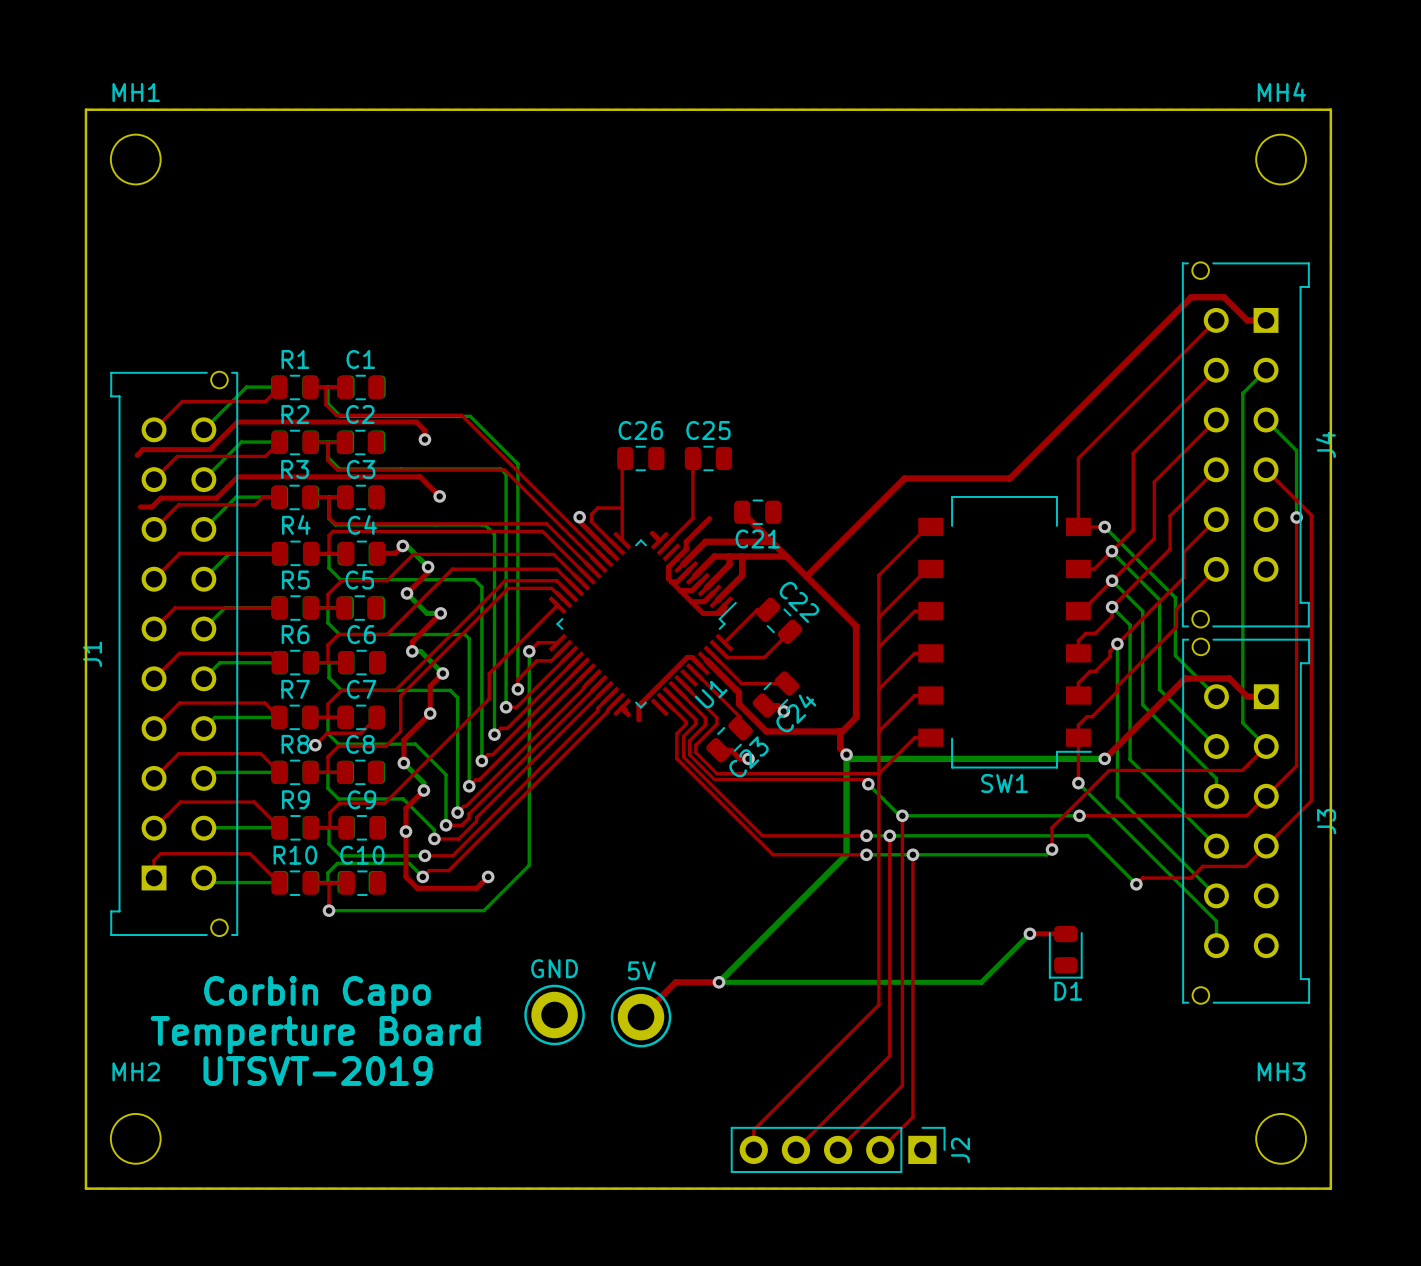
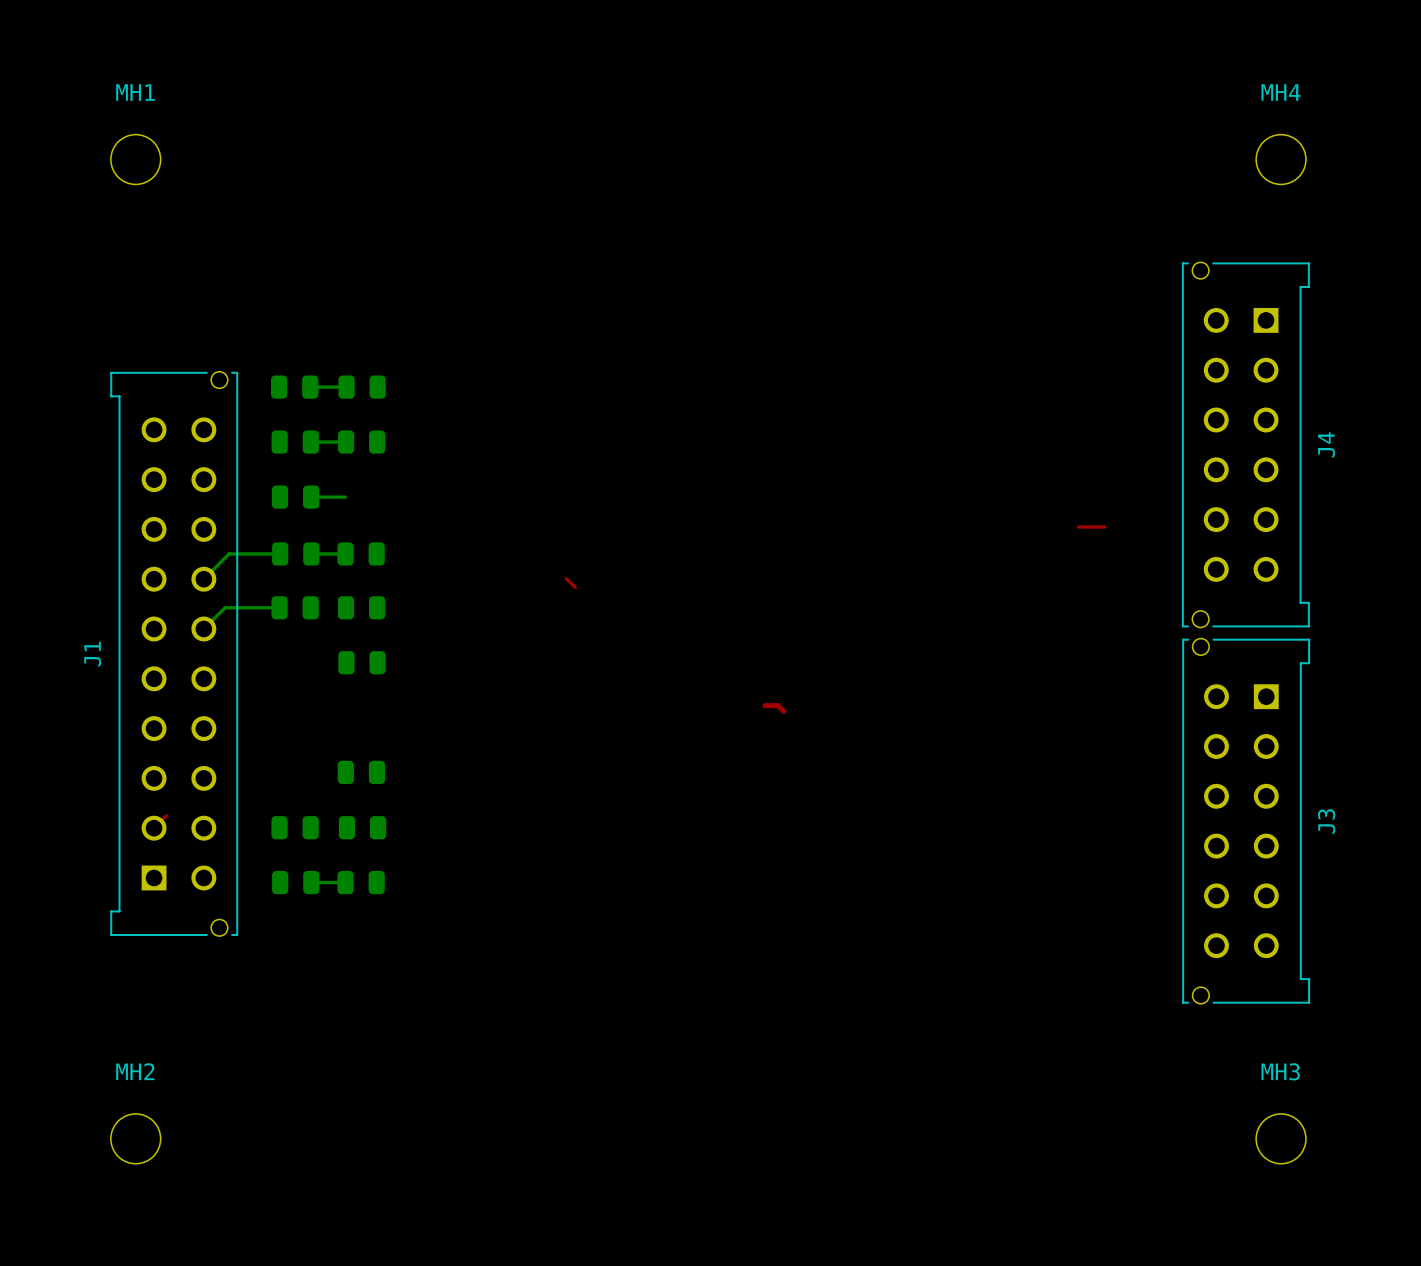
board edge: (85, 109) (85, 1188) (1330, 1188) (1330, 109) (85, 109) -> none
top track: (1216, 320) (1078, 458) (1078, 526) -> none
top track: (1266, 320) (1247, 320) (1224, 297) (1191, 297) (1009, 478) (904, 478) (806, 576) -> none
top track: (1216, 370) (1133, 453) (1133, 530) (1094, 569) (1078, 569) -> none
bottom track: (1266, 370) (1242, 393) (1242, 723) (1266, 746) -> none
top track: (279, 387) (265, 401) (182, 401) (154, 429) -> none
bottom track: (279, 387) (246, 387) (203, 429) -> none
R1: (295, 387) -> none
top track: (310, 387) (345, 387) -> none
top track: (325, 387) (325, 404) (336, 415) (461, 415) (604, 558) -> none
bottom track: (327, 387) (327, 403) (340, 416) (470, 416) (517, 463) (517, 689) -> none
C1: (360, 387) -> none
top track: (1216, 420) (1154, 481) (1154, 538) (1081, 611) (1078, 611) -> none
bottom track: (1266, 420) (1296, 450) (1296, 517) -> none
top track: (424, 439) (424, 430) (416, 422) (237, 422) (209, 449) (142, 449) (137, 455) -> none
via: (424, 439) -> none
top track: (279, 442) (265, 456) (177, 456) (154, 479) -> none
bottom track: (279, 442) (241, 442) (203, 479) -> none
R2: (294, 442) -> none
top track: (310, 442) (344, 442) -> none
top track: (327, 442) (327, 460) (337, 470) (504, 470) (598, 564) -> none
bottom track: (327, 442) (327, 457) (339, 469) (500, 469) (506, 474) (506, 707) -> none
C2: (360, 442) -> none
top track: (625, 458) (622, 461) (622, 540) -> none
C26: (640, 458) -> none
top track: (692, 458) (692, 518) (665, 546) -> none
C25: (708, 458) -> none
top track: (1216, 469) (1170, 515) (1170, 549) (1112, 607) (1112, 616) (1095, 633) (1085, 633) (1078, 640) (1078, 653) -> none
top track: (1266, 469) (1311, 515) (1311, 801) (1245, 866) (1202, 866) (1191, 877) (1142, 877) (1136, 884) -> none
top track: (439, 496) (420, 476) (237, 476) (216, 498) (160, 498) (151, 506) (140, 506) -> none
via: (439, 496) -> none
top track: (279, 497) (262, 497) (255, 504) (178, 504) (154, 529) -> none
bottom track: (280, 497) (236, 497) (203, 529) -> none
R3: (294, 497) -> none
top track: (310, 497) (345, 497) -> none
top track: (329, 497) (329, 517) (335, 523) (546, 523) (592, 569) -> none
bottom track: (329, 497) (329, 518) (335, 524) (485, 524) (494, 534) (494, 734) -> none
C3: (361, 497) -> none
top track: (622, 508) (597, 508) (591, 514) (591, 521) (616, 546) -> none
top track: (742, 512) (856, 626) (856, 717) (842, 731) (766, 731) (739, 704) (739, 692) (706, 660) -> none
C21: (757, 512) -> none
top track: (579, 517) (579, 521) (610, 552) -> none
via: (579, 517) -> none
top track: (1296, 517) (1296, 765) (1246, 815) (1079, 815) -> none
via: (1296, 517) -> none
top track: (709, 518) (686, 541) (686, 549) (668, 567) (668, 578) (703, 613) (720, 613) (724, 609) (724, 605) -> none
top track: (1216, 519) (1183, 552) (1183, 577) (1110, 651) (1110, 656) (1095, 671) (1089, 671) (1078, 682) (1078, 695) -> none
top track: (930, 526) (927, 526) (878, 575) (878, 1004) (753, 1129) (753, 1149) -> none
bottom track: (1104, 527) (1175, 597) (1175, 655) (1216, 696) -> none
via: (1104, 527) -> none
top track: (652, 533) (659, 540) -> none
top track: (770, 540) (705, 541) (683, 564) -> none
top track: (402, 545) (395, 553) (377, 553) -> none
bottom track: (402, 545) (407, 545) (428, 567) -> none
via: (402, 545) -> none
bottom track: (1111, 551) (1159, 599) (1159, 689) (1216, 746) -> none
via: (1111, 551) -> none
top track: (279, 553) (179, 553) (154, 579) -> none
R4: (295, 553) -> none
top track: (311, 553) (346, 553) -> none
top track: (329, 553) (329, 535) (333, 531) (542, 531) (587, 575) -> none
bottom track: (329, 553) (329, 568) (340, 579) (474, 579) (481, 587) (481, 760) -> none
C4: (361, 553) -> none
top track: (729, 556) (729, 564) (706, 587) -> none
top track: (742, 556) (742, 575) (718, 599) -> none
top track: (786, 556) (714, 556) (694, 575) -> none
top track: (428, 567) (428, 572) (407, 593) -> none
via: (428, 567) -> none
top track: (930, 569) (927, 569) (878, 617) -> none
top track: (1216, 569) (1176, 609) (1176, 627) (1117, 686) (1117, 691) (1092, 716) (1086, 716) (1078, 725) (1078, 783) -> none
top track: (689, 570) (677, 581) (671, 581) -> none
top track: (566, 578) (556, 569) (452, 569) (386, 634) (338, 634) (327, 645) (327, 662) -> none
bottom track: (1112, 580) (1142, 611) (1142, 704) (1216, 778) (1216, 796) -> none
via: (1112, 580) -> none
top track: (581, 581) (553, 554) (413, 554) (386, 580) (341, 580) (327, 594) (327, 608) -> none
top track: (700, 581) (692, 590) (680, 590) -> none
bottom track: (407, 593) (427, 613) (440, 613) -> none
via: (407, 593) -> none
top track: (569, 593) (556, 580) (505, 580) (395, 690) (341, 690) (327, 704) (327, 717) -> none
top track: (712, 593) (704, 601) (691, 601) -> none
top track: (563, 599) (551, 588) (508, 588) (400, 695) (400, 731) (385, 746) (338, 746) (327, 756) (327, 772) -> none
top track: (557, 605) (489, 673) (489, 698) (384, 803) (339, 803) (330, 812) (330, 827) -> none
bottom track: (327, 607) (327, 622) (339, 634) (464, 634) (469, 638) (469, 786) -> none
bottom track: (1112, 607) (1130, 625) (1130, 759) (1216, 846) -> none
via: (1112, 607) -> none
top track: (279, 608) (175, 608) (154, 629) -> none
R5: (295, 608) -> none
top track: (311, 608) (344, 608) -> none
C5: (359, 608) -> none
top track: (768, 609) (757, 609) (724, 642) -> none
top track: (930, 611) (914, 611) (878, 647) -> none
top track: (440, 613) (412, 641) (412, 651) -> none
via: (440, 613) -> none
C22: (779, 620) -> none
U1: (642, 623) -> none
top track: (790, 631) (764, 657) (727, 657) (718, 648) -> none
SW1: (1005, 632) -> none
top track: (557, 642) (537, 642) (529, 651) -> none
bottom track: (1117, 643) (1117, 796) (1216, 895) -> none
via: (1117, 643) -> none
top track: (563, 648) (551, 660) (536, 660) (517, 679) (517, 689) -> none
bottom track: (412, 651) (420, 651) (442, 673) -> none
via: (412, 651) -> none
bottom track: (529, 651) (529, 865) (483, 910) (329, 910) -> none
via: (529, 651) -> none
top track: (930, 653) (914, 653) (878, 689) -> none
top track: (569, 654) (516, 707) (506, 707) -> none
top track: (712, 654) (741, 683) (786, 683) -> none
top track: (575, 660) (507, 728) (500, 728) (494, 734) -> none
top track: (279, 662) (270, 653) (179, 653) (154, 678) -> none
bottom track: (280, 662) (219, 662) (203, 678) -> none
R6: (295, 662) -> none
top track: (310, 662) (346, 662) -> none
bottom track: (329, 662) (329, 677) (341, 690) (450, 690) (457, 697) (457, 812) -> none
C6: (361, 662) -> none
top track: (581, 666) (492, 754) (488, 754) (481, 760) -> none
top track: (700, 666) (692, 657) (687, 657) (638, 705) (638, 719) -> none
top track: (587, 672) (479, 779) (475, 779) (469, 786) -> none
top track: (694, 672) (740, 717) (740, 728) -> none
top track: (442, 673) (430, 686) (430, 713) (403, 739) (403, 763) -> none
via: (442, 673) -> none
top track: (592, 677) (457, 812) -> none
top track: (598, 683) (468, 814) (468, 818) (461, 825) (446, 825) -> none
via: (517, 689) -> none
top track: (604, 689) (476, 817) (476, 821) (458, 838) (434, 838) -> none
top track: (692, 692) (716, 717) (716, 724) (695, 745) (695, 752) (716, 773) (878, 773) (914, 737) (930, 737) -> none
C24: (775, 694) -> none
top track: (610, 695) (597, 708) (597, 710) (452, 855) (424, 855) -> none
top track: (671, 695) (695, 719) (695, 724) (683, 736) (683, 757) (762, 835) (866, 835) -> none
top track: (930, 695) (914, 695) (878, 731) -> none
top track: (1266, 696) (1247, 696) (1229, 678) (1185, 678) (1104, 758) -> none
top track: (686, 698) (705, 717) (705, 725) (689, 740) (689, 754) (714, 779) (863, 779) (868, 784) -> none
top track: (616, 701) (448, 870) (429, 870) (422, 876) -> none
top track: (665, 701) (686, 721) (676, 733) (676, 758) (773, 854) (866, 854) -> none
via: (506, 707) -> none
top track: (622, 707) (628, 714) -> none
via: (783, 711) -> none
via: (430, 713) -> none
top track: (279, 717) (264, 703) (179, 703) (154, 728) -> none
bottom track: (279, 717) (215, 717) (203, 728) -> none
R7: (294, 717) -> none
top track: (310, 717) (345, 717) -> none
bottom track: (327, 717) (327, 733) (338, 744) (415, 744) (446, 774) (446, 825) -> none
C7: (361, 717) -> none
top track: (376, 717) (360, 733) (327, 733) (315, 745) -> none
top track: (839, 731) (840, 748) (846, 754) -> none
via: (494, 734) -> none
C23: (729, 739) -> none
via: (315, 745) -> none
top track: (1266, 746) (1242, 770) (1109, 770) (1052, 827) (1052, 849) -> none
top track: (718, 750) (731, 750) (739, 758) (748, 758) -> none
via: (846, 754) -> none
via: (748, 758) -> none
bottom track: (1104, 758) (850, 758) (846, 754) (846, 854) (719, 982) (981, 982) (1029, 933) -> none
via: (1104, 758) -> none
via: (481, 760) -> none
bottom track: (403, 763) (423, 783) (423, 790) -> none
via: (403, 763) -> none
top track: (279, 772) (260, 753) (178, 753) (154, 778) -> none
bottom track: (279, 772) (209, 772) (203, 778) -> none
R8: (295, 772) -> none
top track: (310, 772) (344, 772) -> none
bottom track: (327, 772) (327, 788) (338, 798) (403, 798) (434, 830) (434, 838) -> none
C8: (360, 772) -> none
bottom track: (1078, 783) (1216, 921) (1216, 945) -> none
via: (1078, 783) -> none
bottom track: (868, 784) (899, 815) (1079, 815) -> none
via: (868, 784) -> none
via: (469, 786) -> none
top track: (423, 790) (405, 808) (405, 876) (417, 888) (476, 888) (488, 876) -> none
via: (423, 790) -> none
via: (457, 812) -> none
top track: (166, 815) (180, 802) (254, 802) (279, 827) -> none
top track: (902, 815) (902, 1085) (838, 1149) -> none
via: (902, 815) -> none
via: (1079, 815) -> none
via: (446, 825) -> none
bottom track: (279, 827) (203, 828) -> none
R9: (295, 827) -> none
top track: (311, 827) (346, 827) -> none
bottom track: (329, 827) (329, 844) (340, 855) (424, 855) -> none
C9: (361, 827) -> none
via: (405, 831) -> none
bottom track: (866, 835) (1087, 835) (1136, 884) -> none
via: (866, 835) -> none
top track: (889, 835) (889, 1056) (795, 1149) -> none
via: (889, 835) -> none
via: (434, 838) -> none
bottom track: (1052, 849) (1046, 854) (866, 854) -> none
via: (1052, 849) -> none
via: (866, 854) -> none
top track: (912, 854) (912, 1117) (880, 1149) -> none
via: (912, 854) -> none
via: (424, 855) -> none
bottom track: (422, 876) (409, 863) (337, 863) (327, 872) (327, 882) -> none
via: (422, 876) -> none
via: (488, 876) -> none
top track: (154, 877) (154, 860) (160, 853) (249, 853) (279, 883) -> none
bottom track: (203, 877) (208, 882) (280, 882) -> none
R10: (294, 883) -> none
top track: (310, 883) (346, 883) -> none
top track: (329, 883) (329, 910) -> none
C10: (362, 883) -> none
via: (1136, 884) -> none
via: (329, 910) -> none
top track: (1029, 933) (1065, 934) -> none
via: (1029, 933) -> none
D1: (1065, 952) -> none
top track: (719, 982) (675, 982) (641, 1017) -> none
via: (719, 982) -> none
text: Corbin Capo (317, 995) -> none
GND: (554, 1015) -> none
5V: (641, 1017) -> none
text: Temperture Board (315, 1035) -> none
text: UTSVT-2019 (318, 1071) -> none
J2: (838, 1149) -> none

